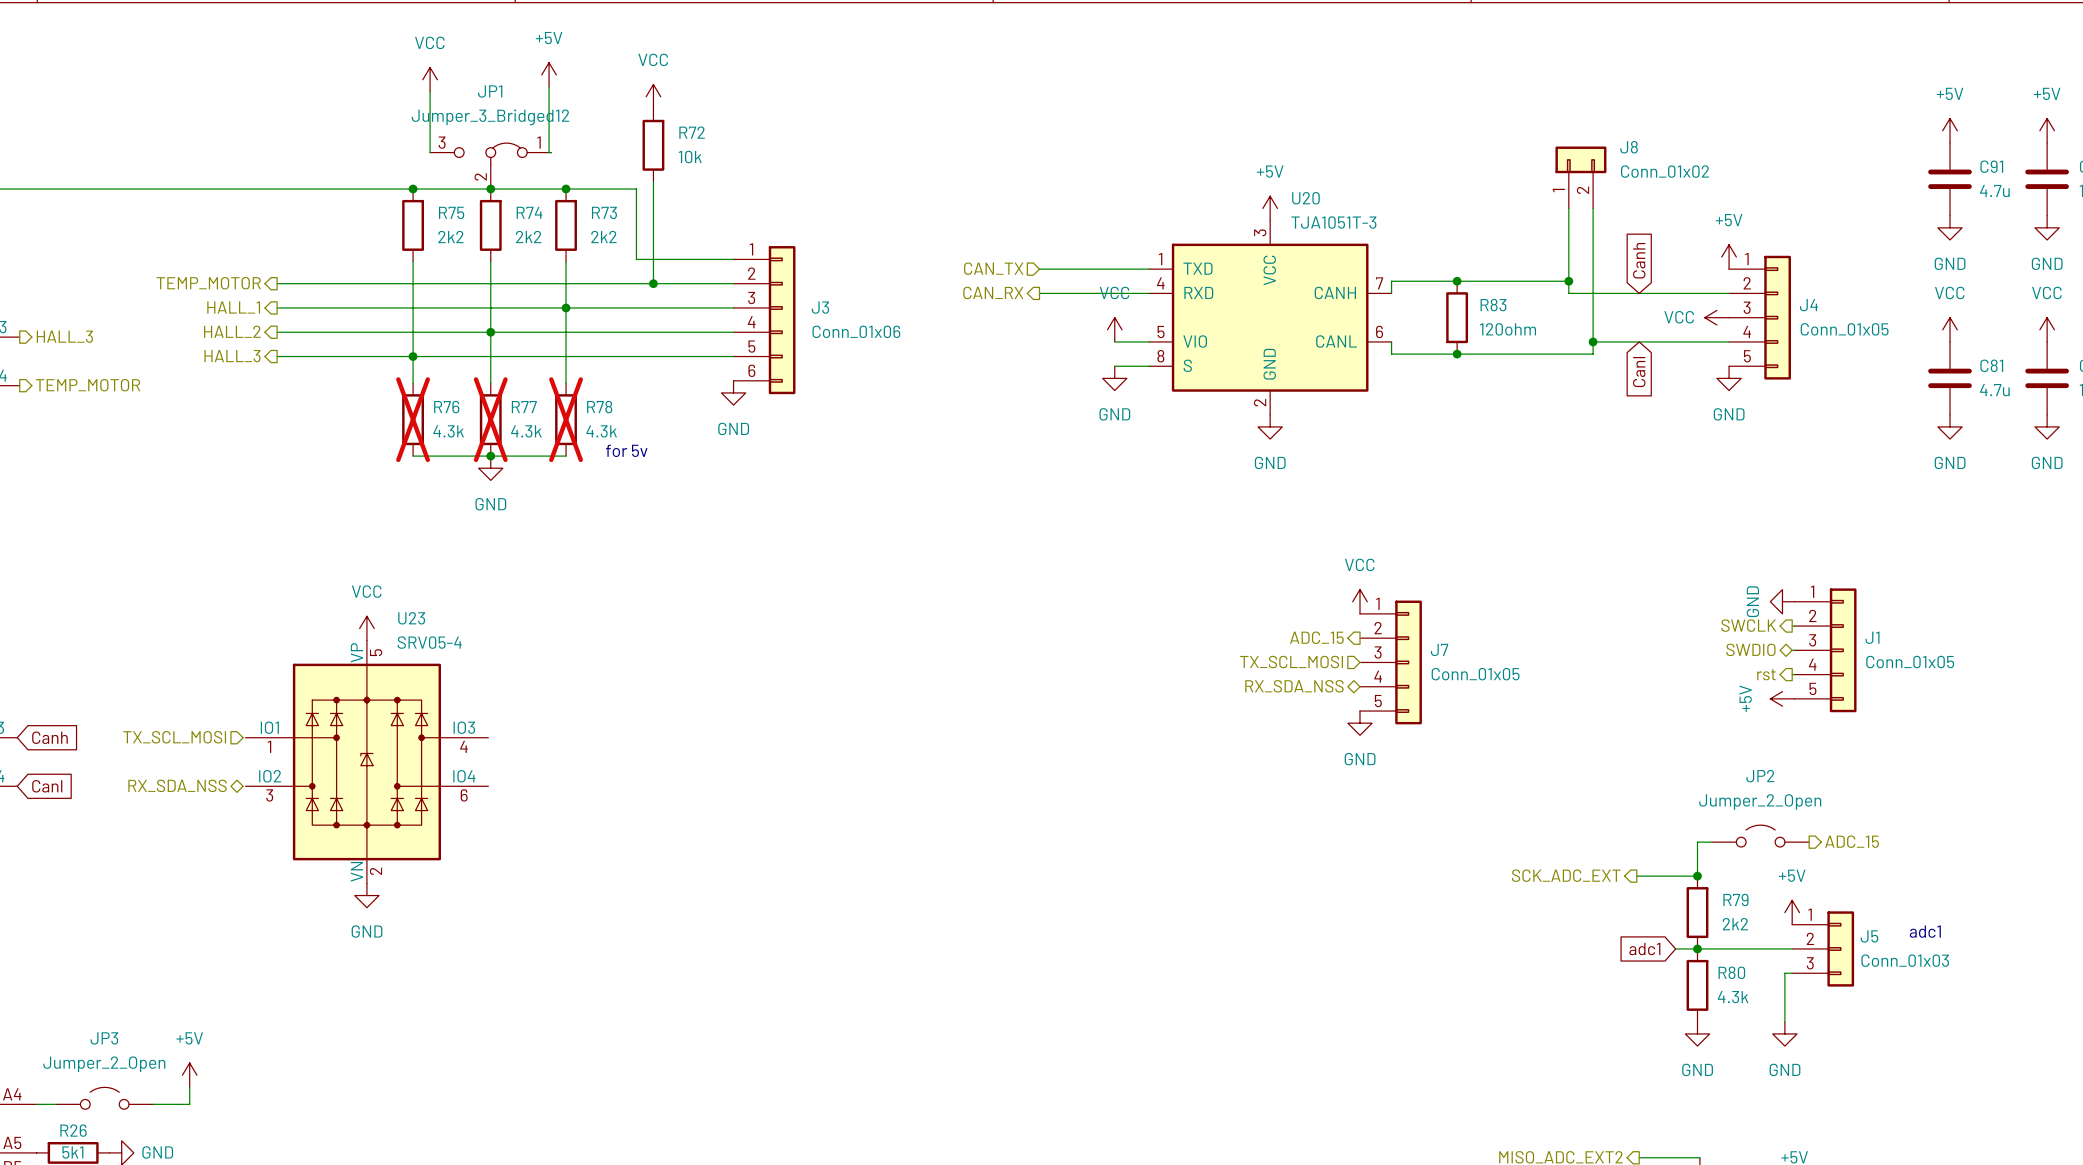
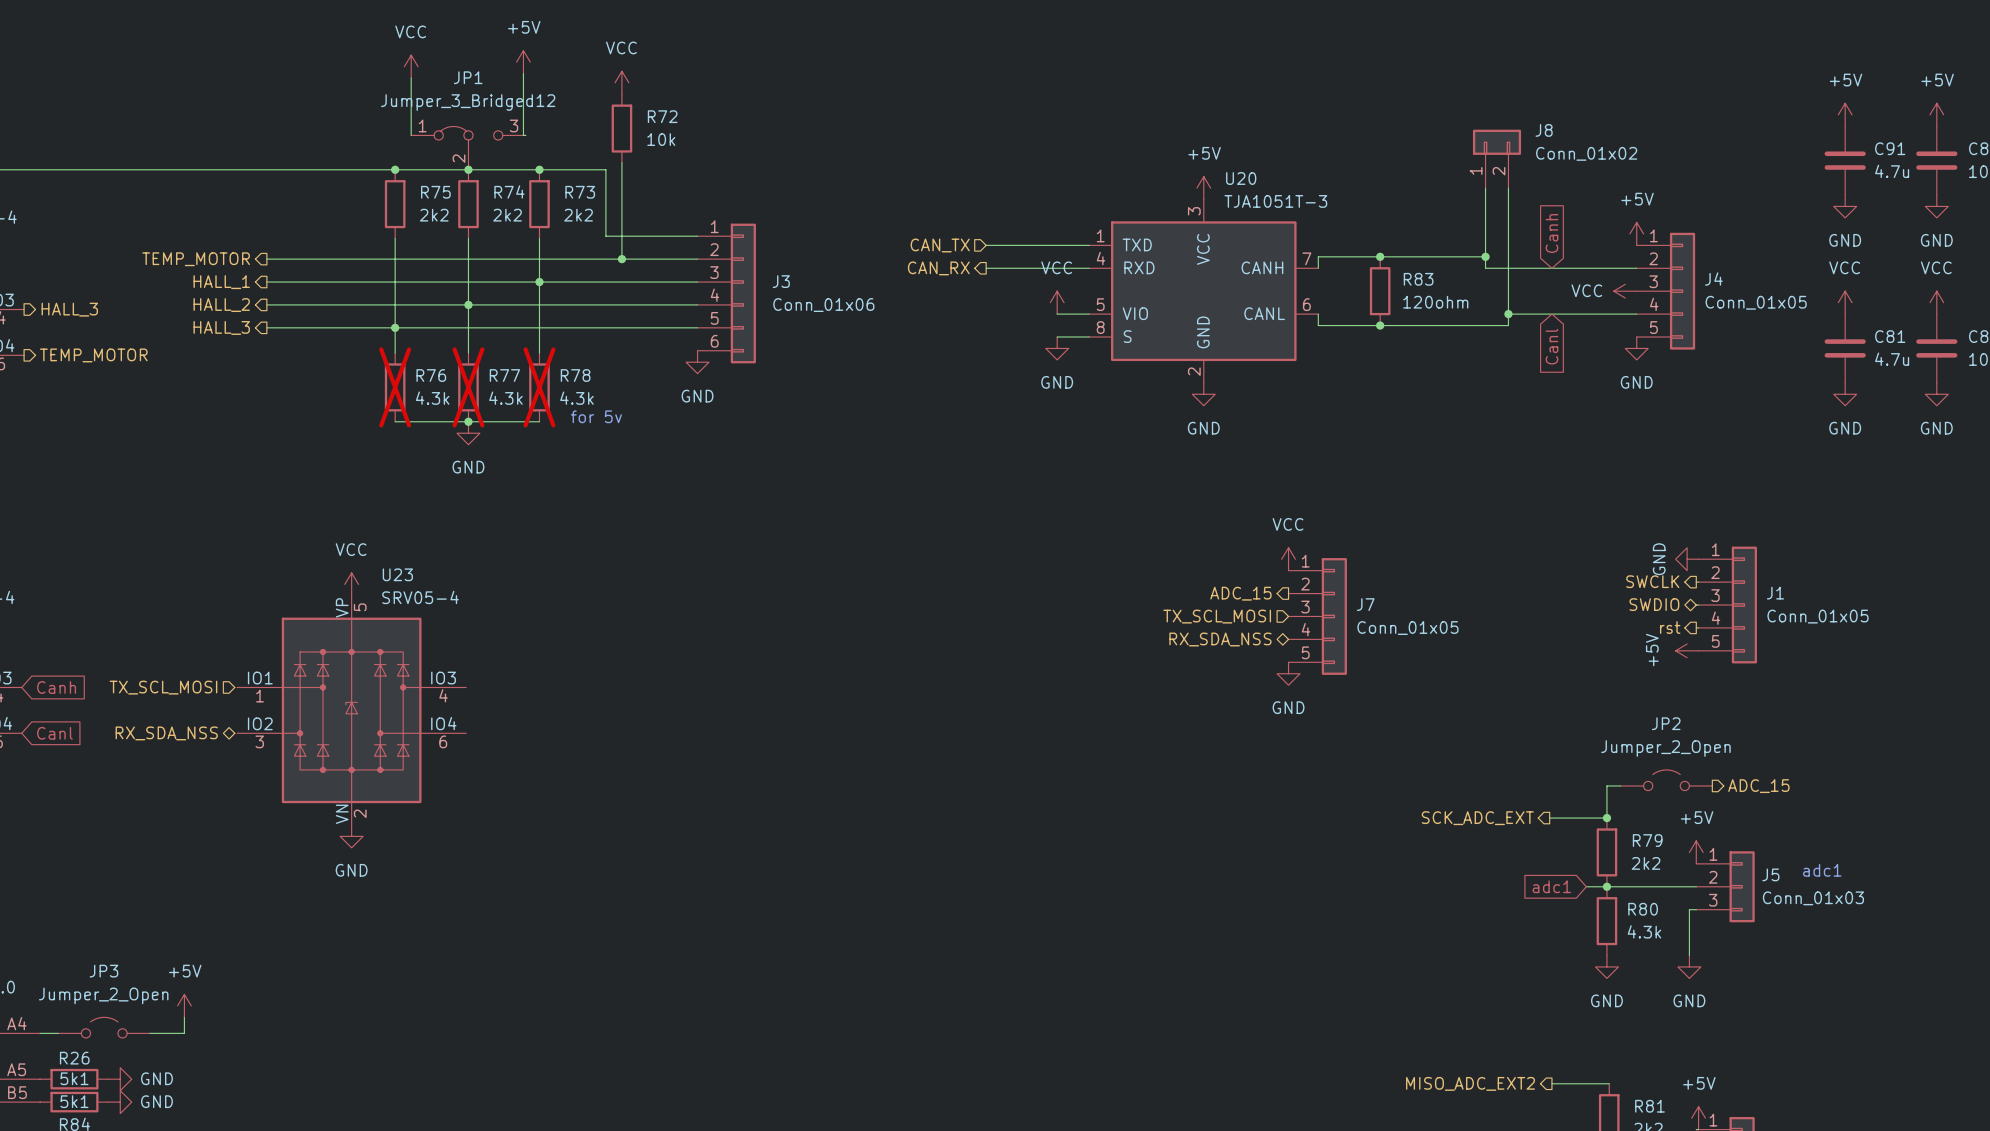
JP1 flip: as is (490, 153) -> left-right (468, 136)

